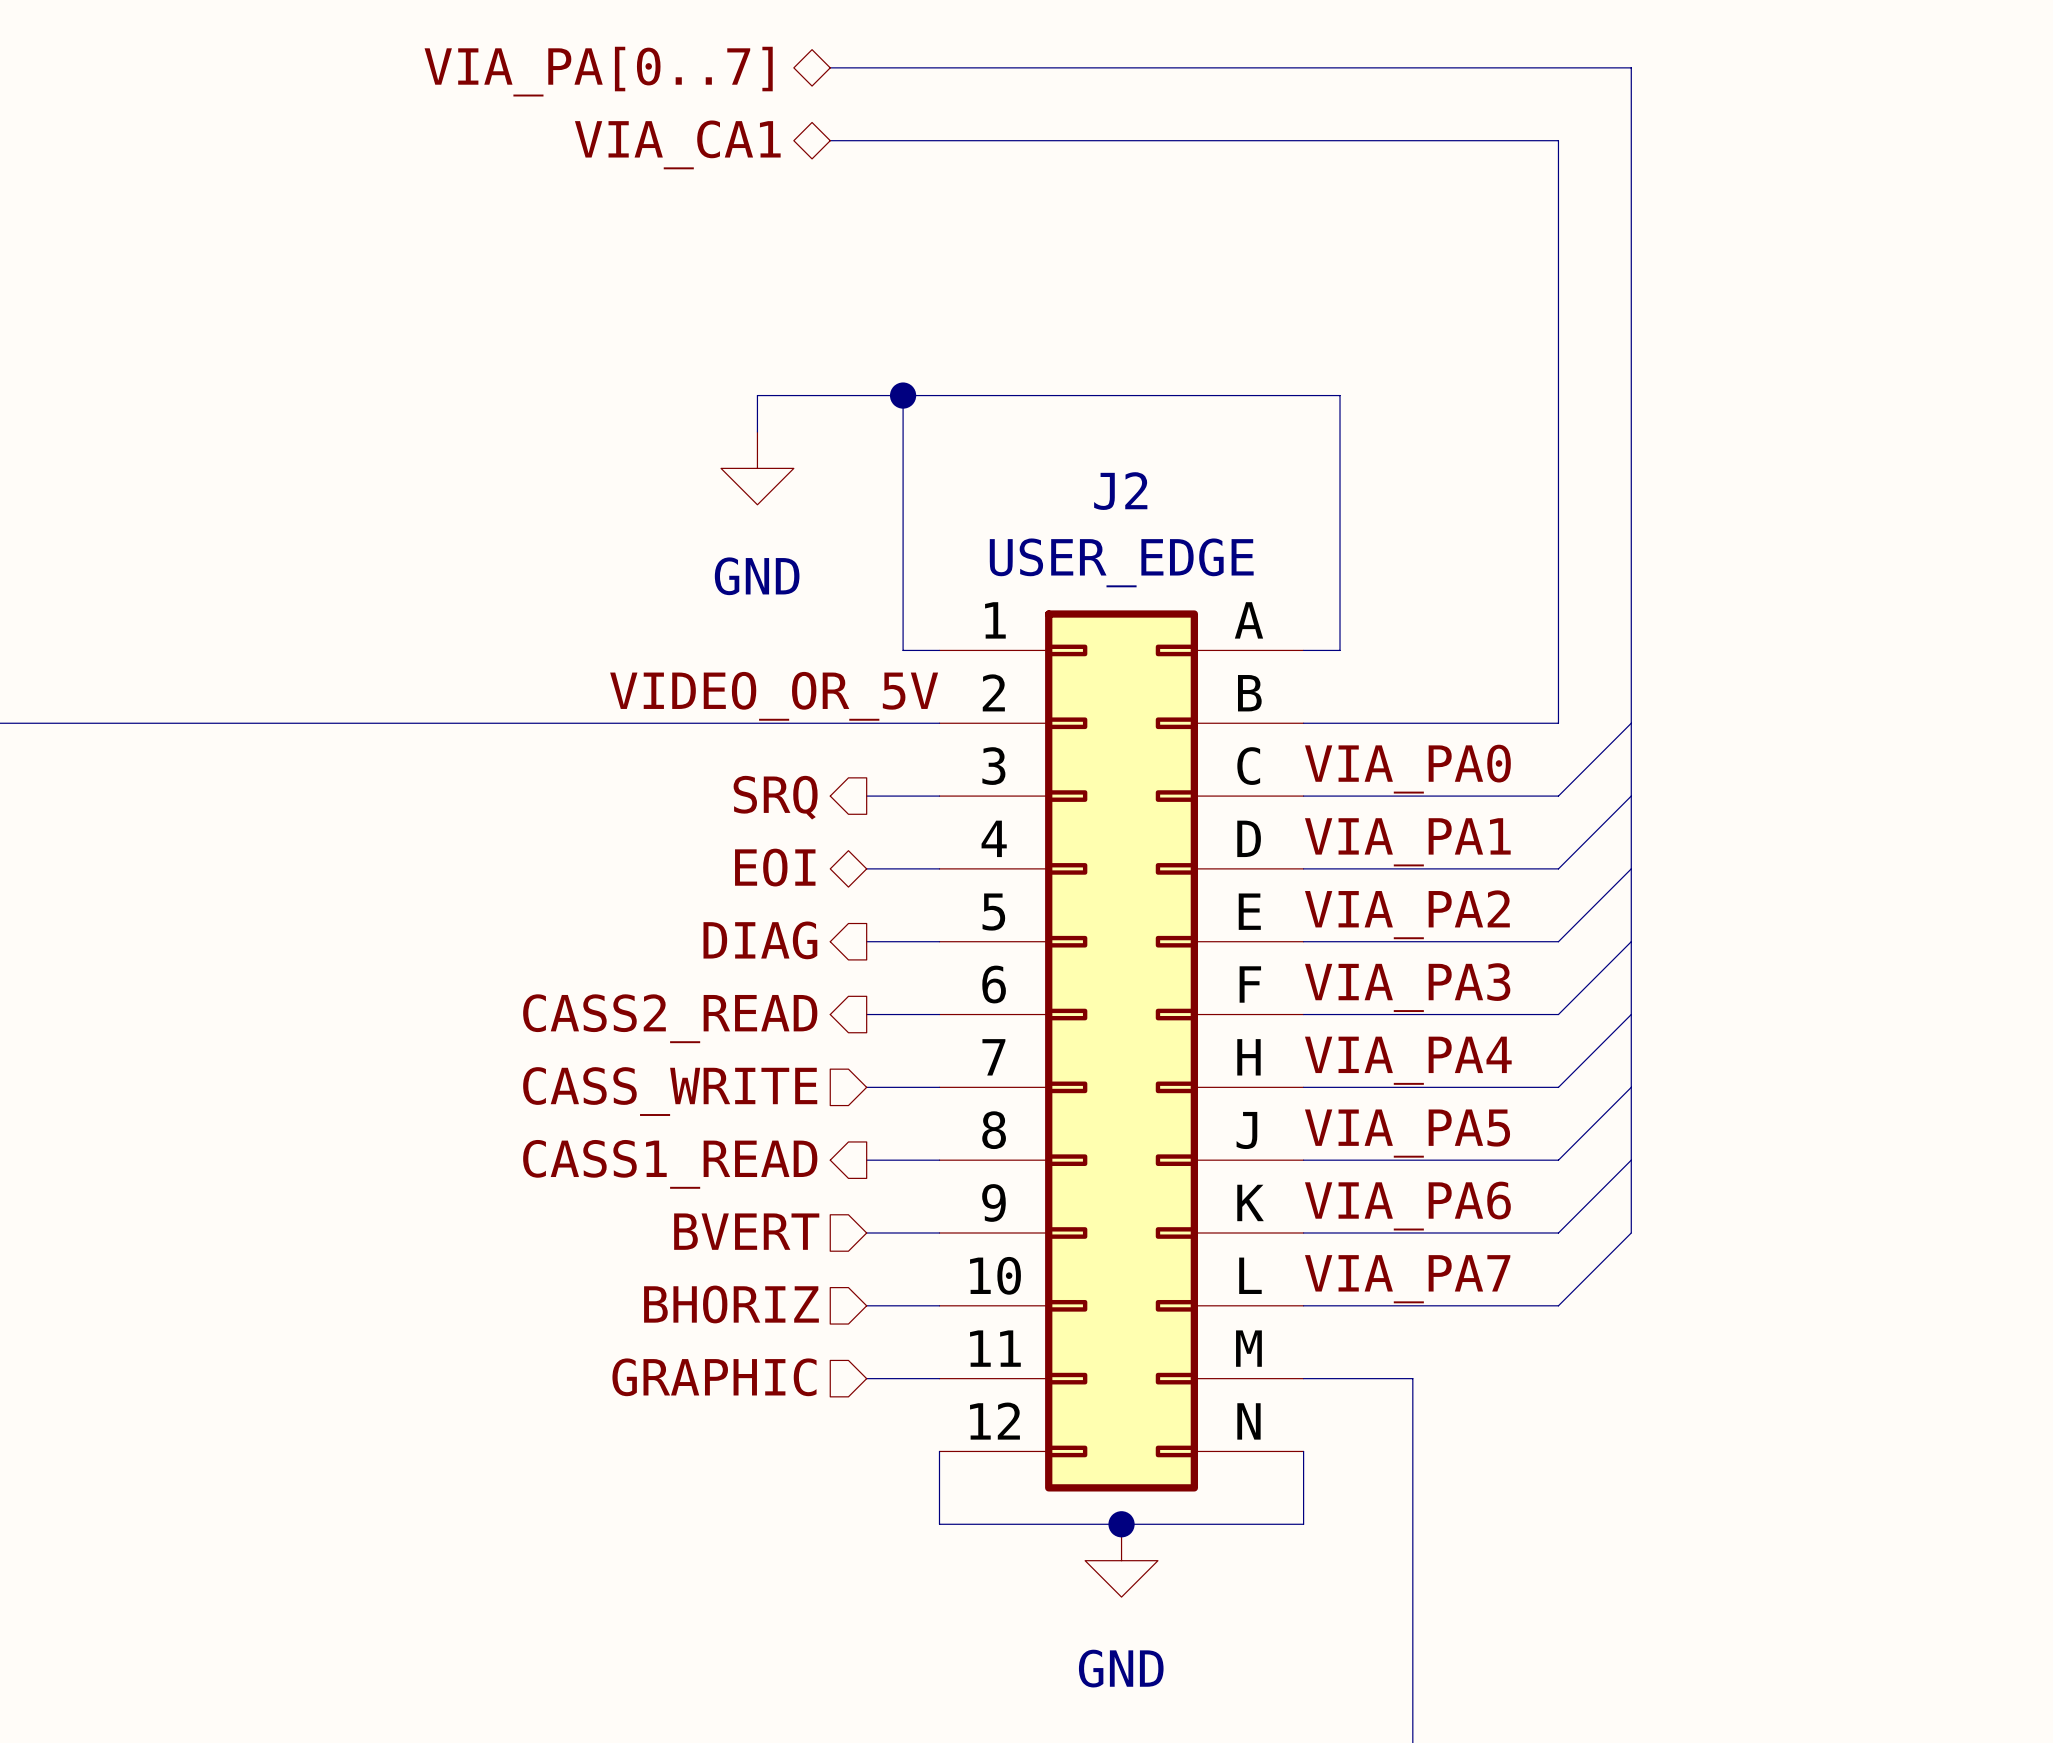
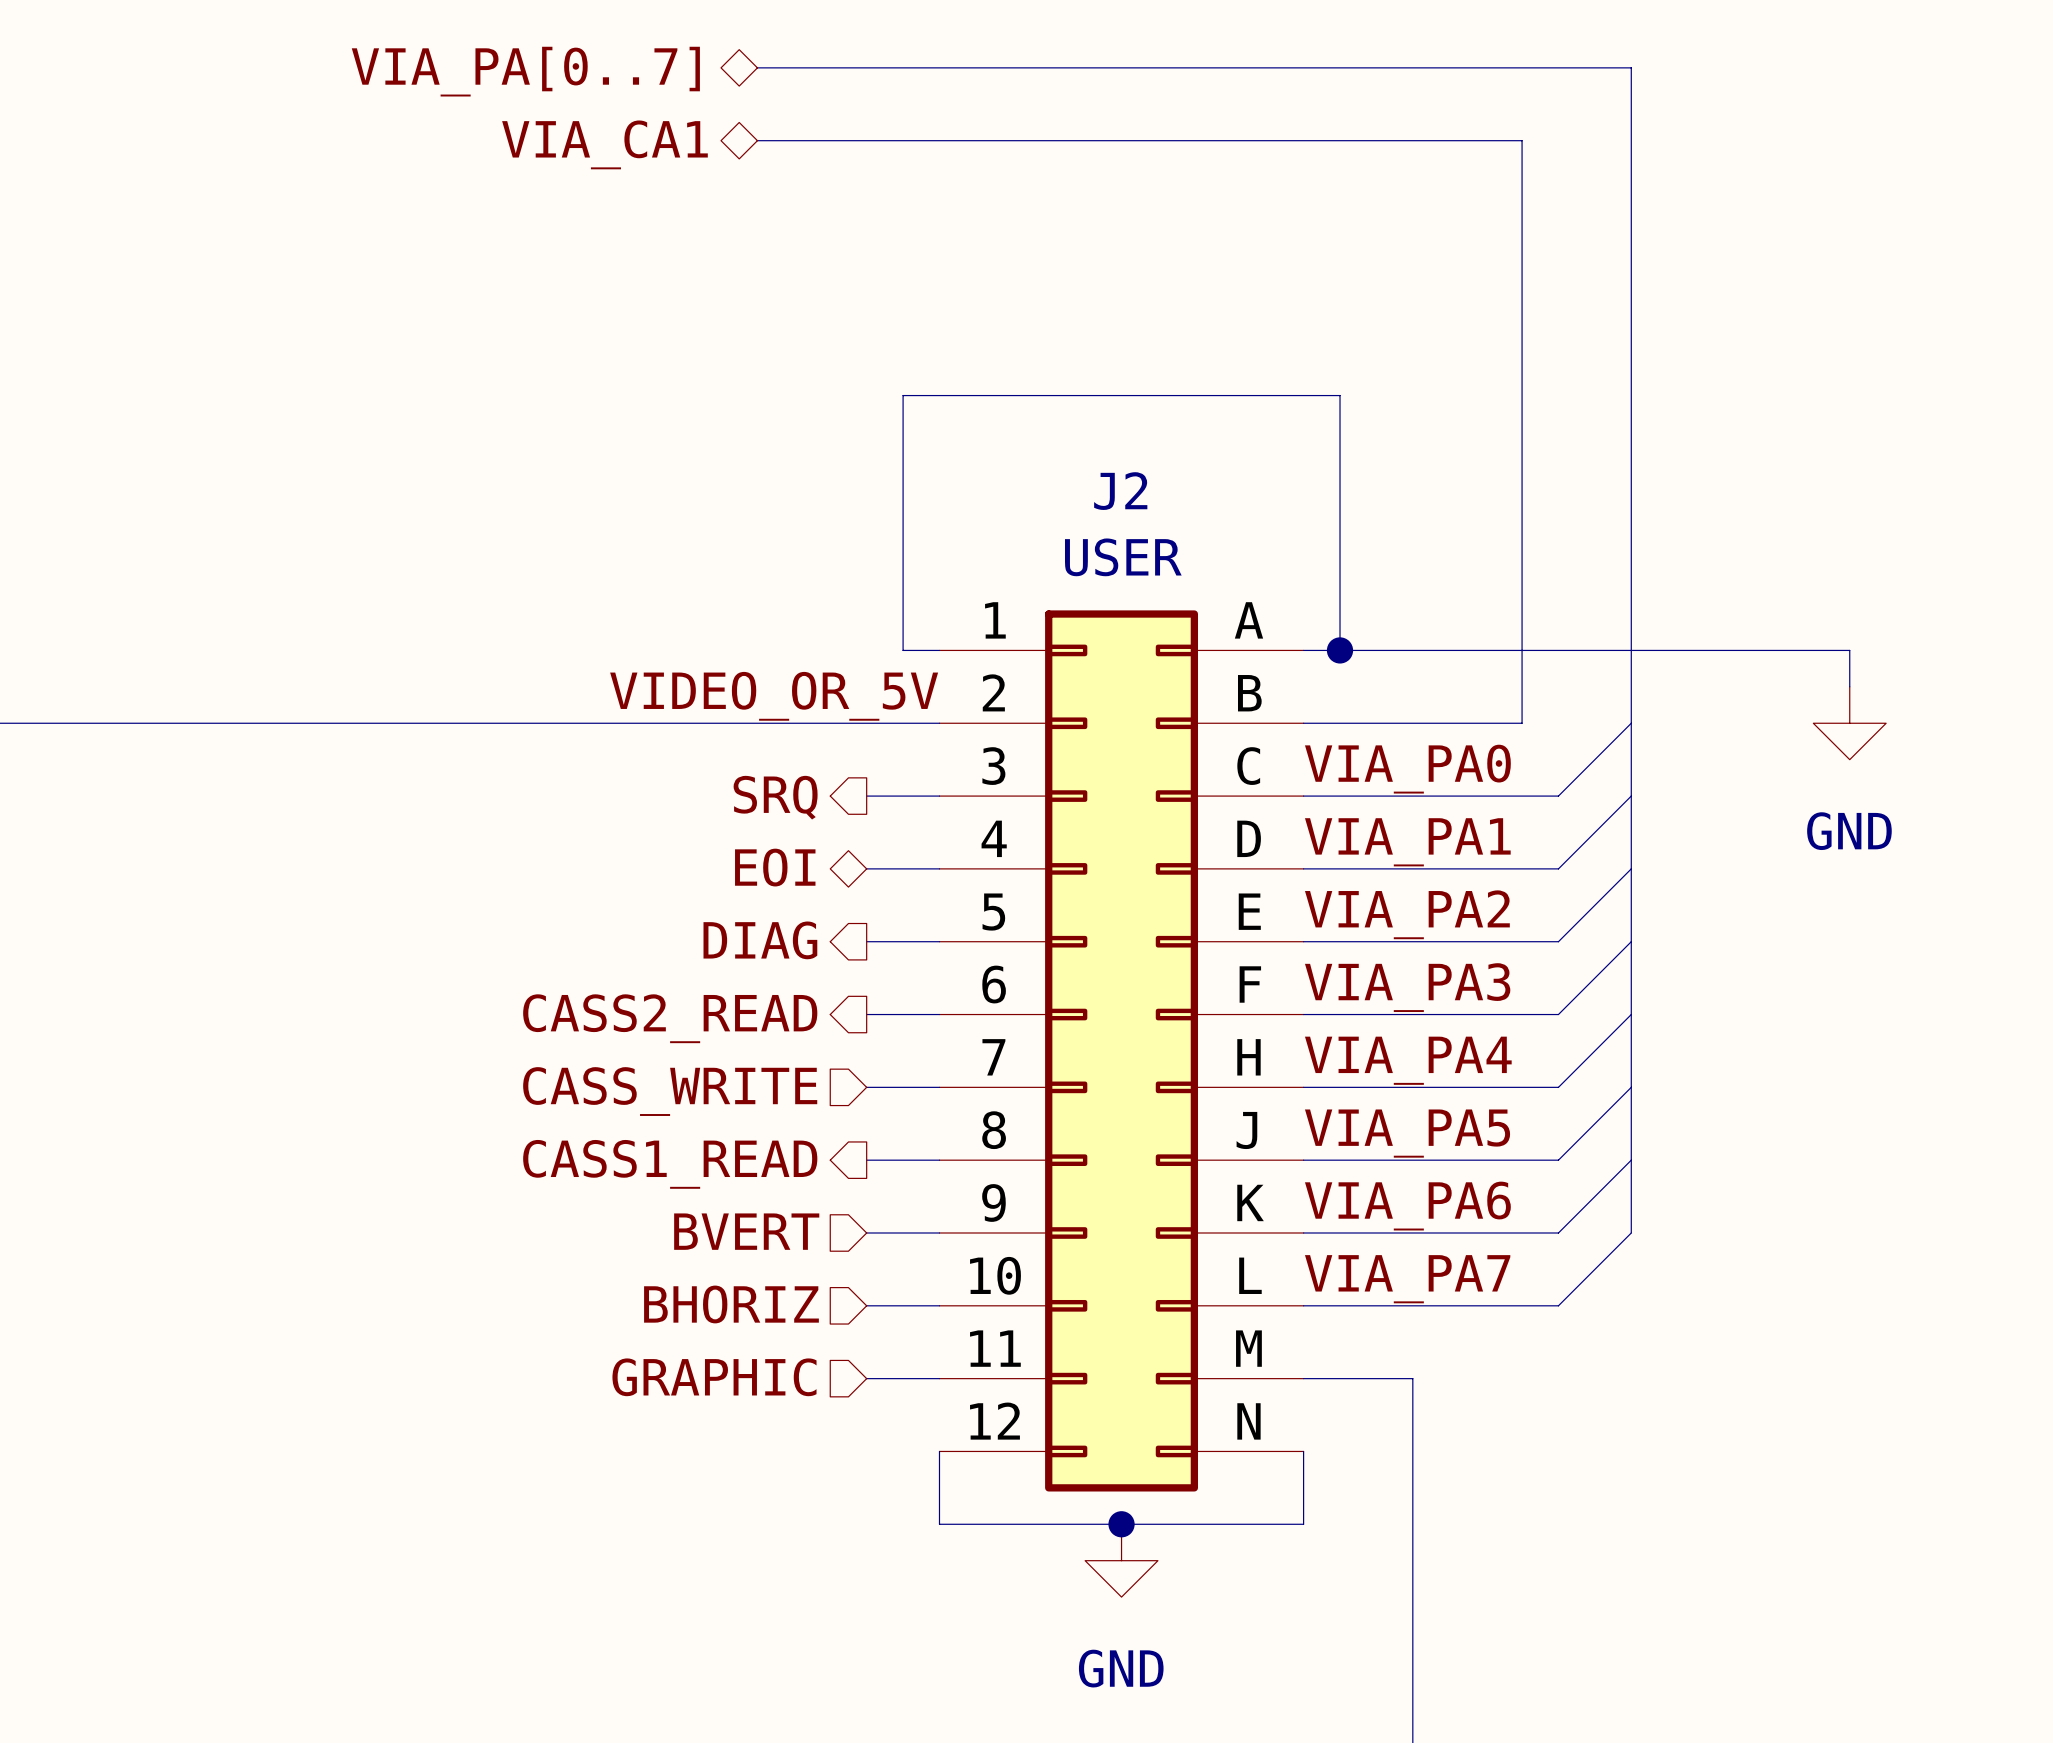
bus: none -> (757, 67) (830, 67)
hierarchical label position: VIA_PA[0..7] (598, 71) -> VIA_PA[0..7] (525, 71)
wire: none -> (757, 140) (830, 140)
wire: (1522, 140) (1558, 140) (1558, 723) (1522, 723) -> (1522, 140) (1522, 723)
hierarchical label position: VIA_CA1 (677, 144) -> VIA_CA1 (604, 144)
wire: (903, 395) (757, 395) (757, 431) -> none
junction: (903, 395) -> none
power symbol: GND (757, 468) -> none
J2 value: USER_EDGE (1121, 562) -> USER (1123, 557)
wire: none -> (1340, 650) (1849, 650) (1849, 686)
junction: none -> (1340, 650)
power symbol: none -> GND (1849, 723)

